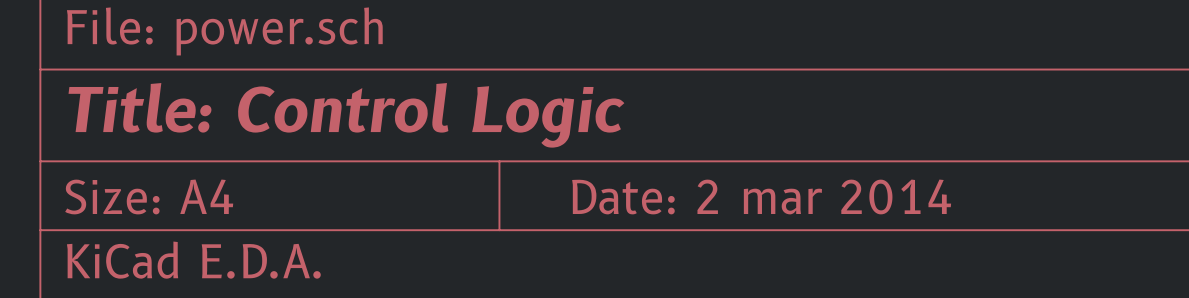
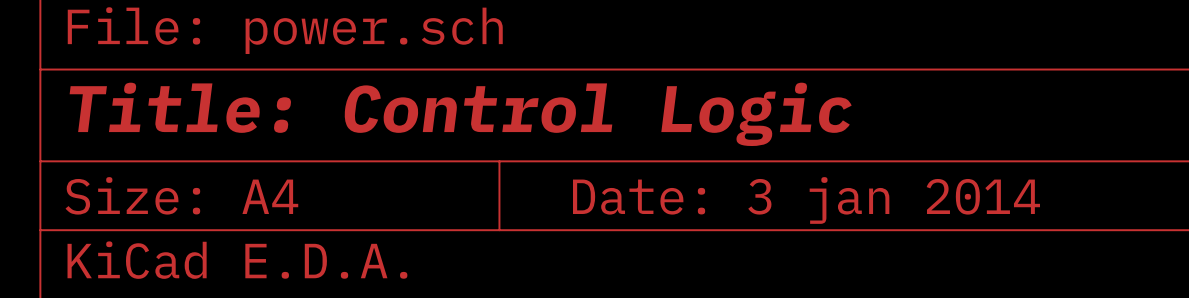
title block: Date: 2 mar 2014 (761, 196) -> Date: 3 jan 2014 (806, 200)

